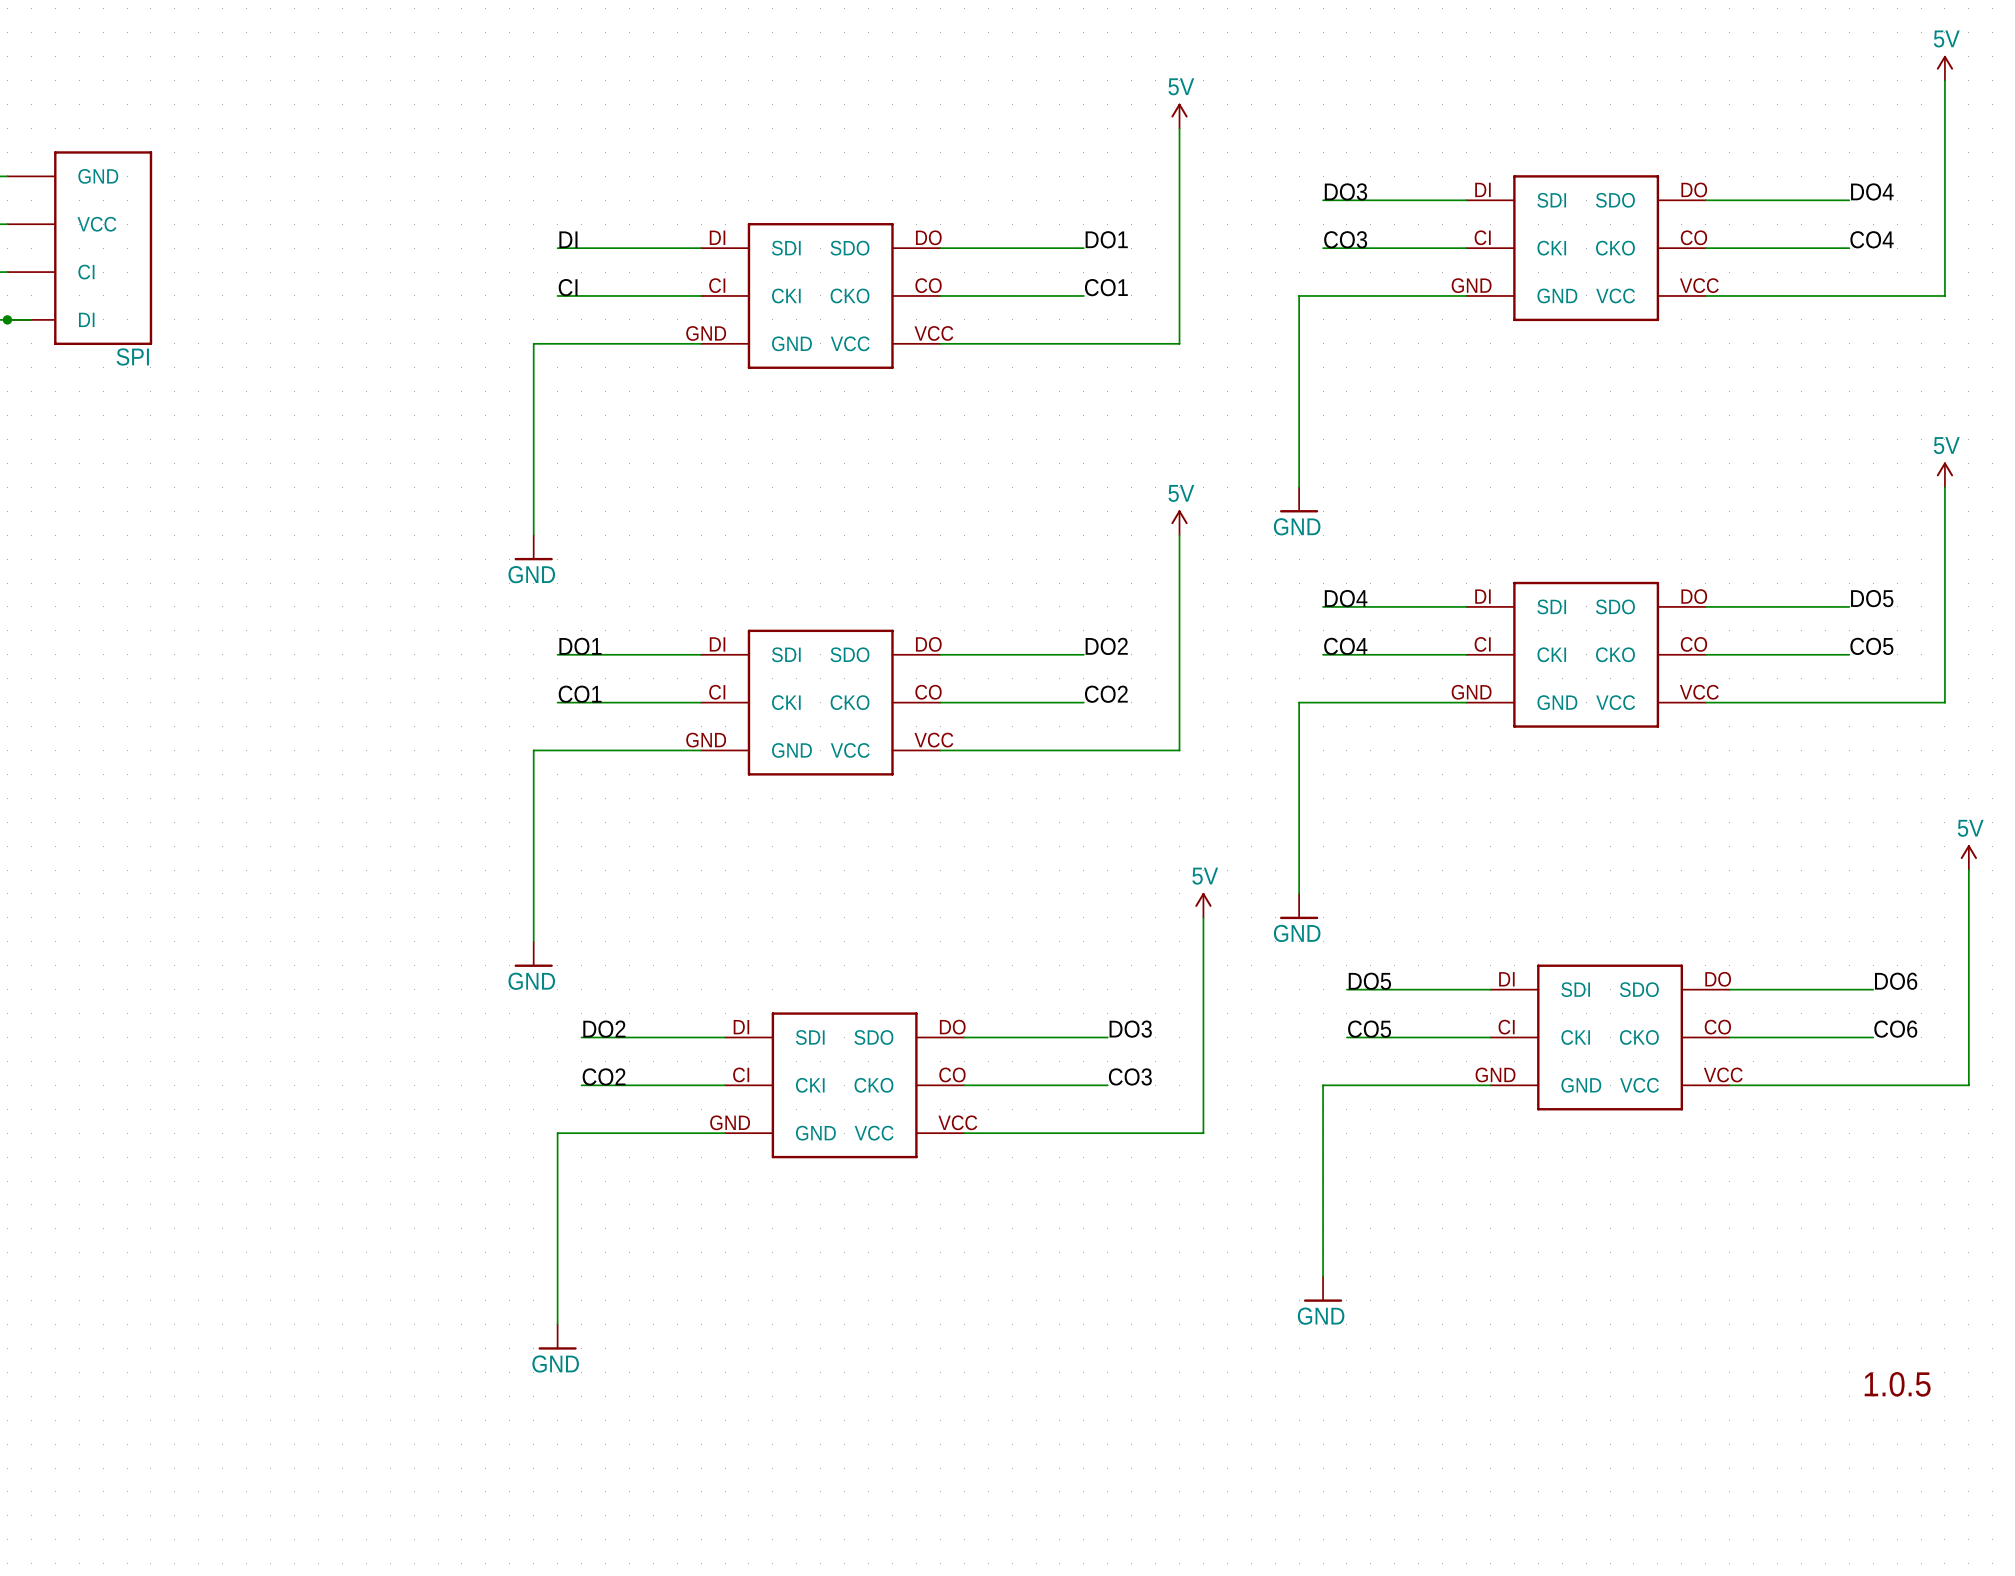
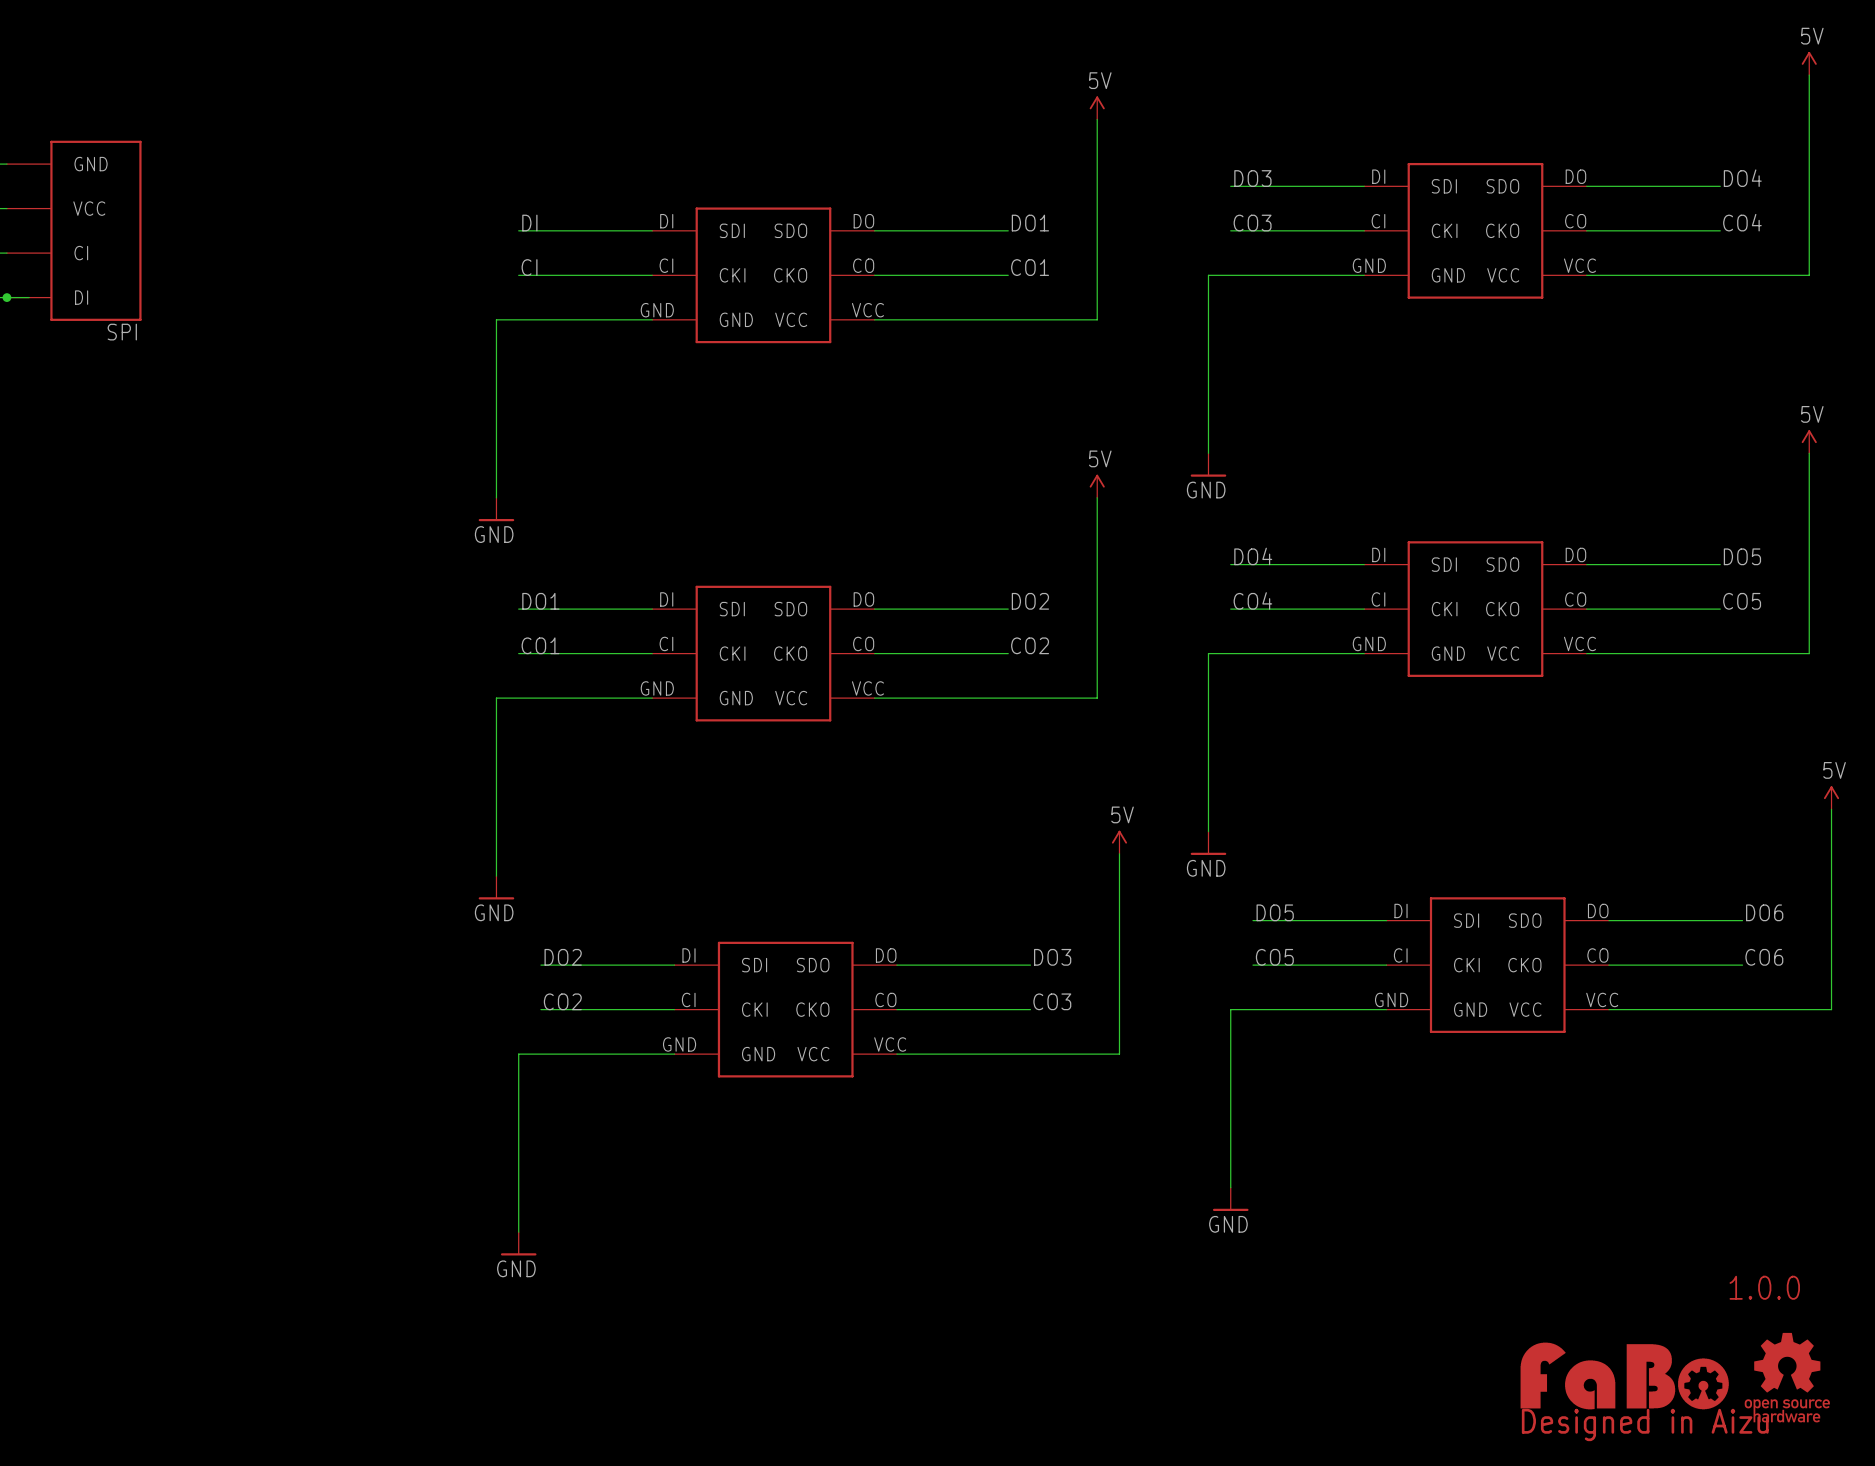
text: 1.0.5 (1897, 1384) -> 1.0.0 (1764, 1287)
part: none -> (1624, 1375)
part: none -> (1787, 1377)

